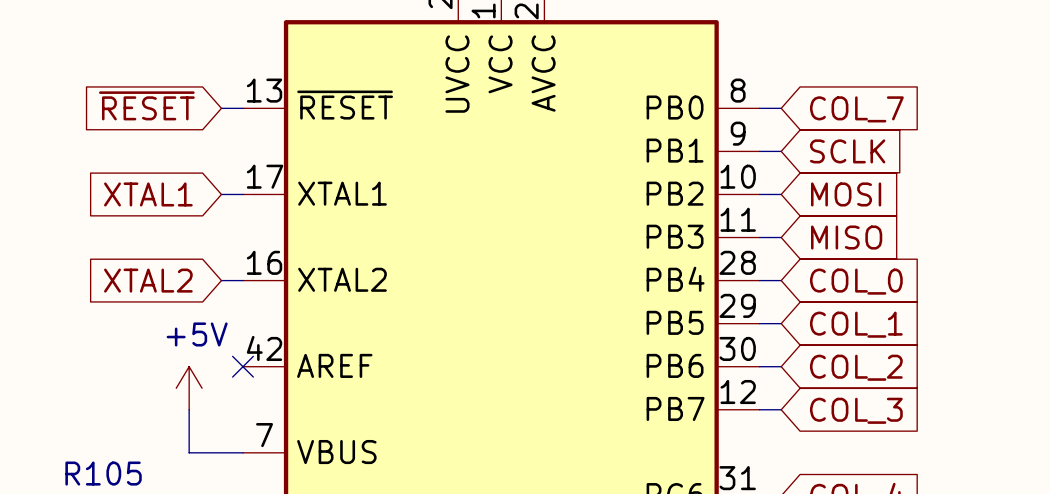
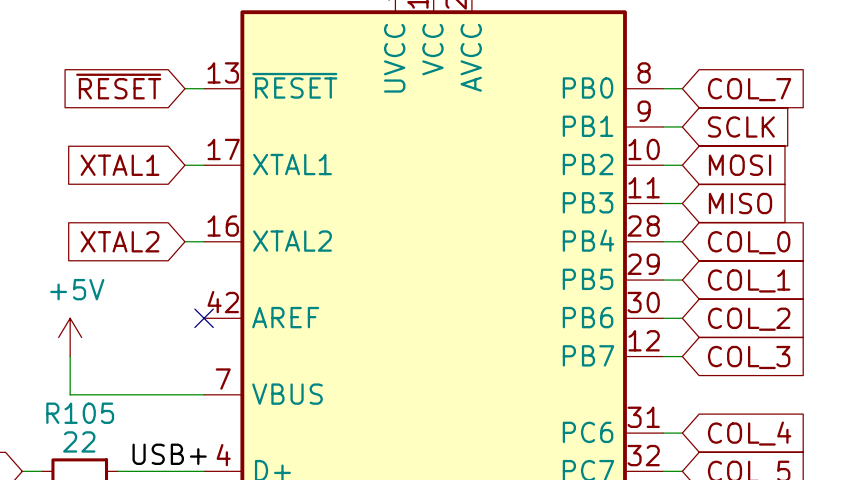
power symbol position: +5V (189, 388) -> +5V (70, 337)
wire: (189, 409) (189, 452) -> (70, 356) (70, 394) (156, 394)

